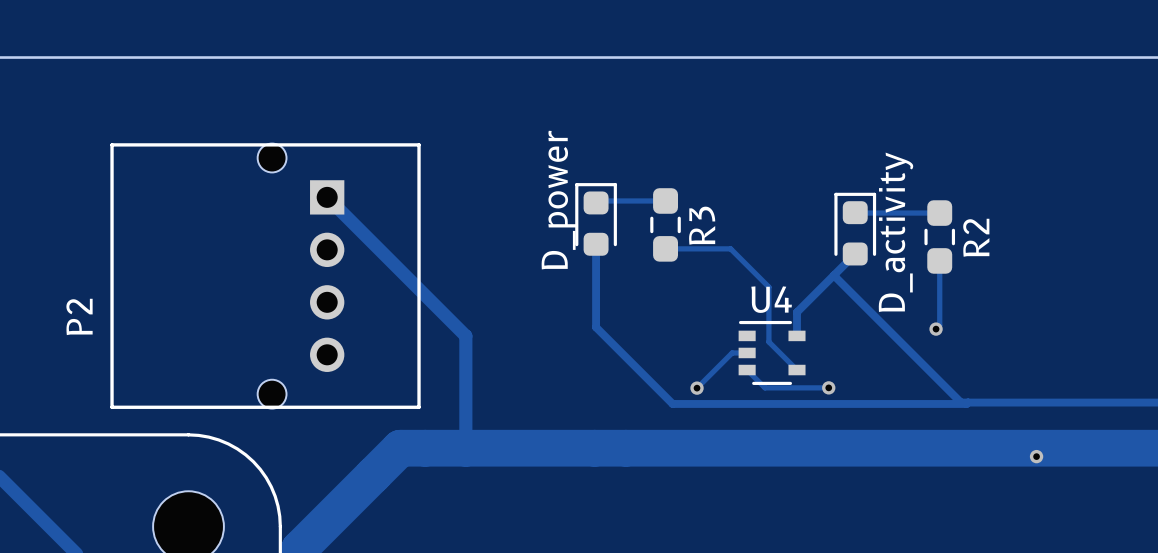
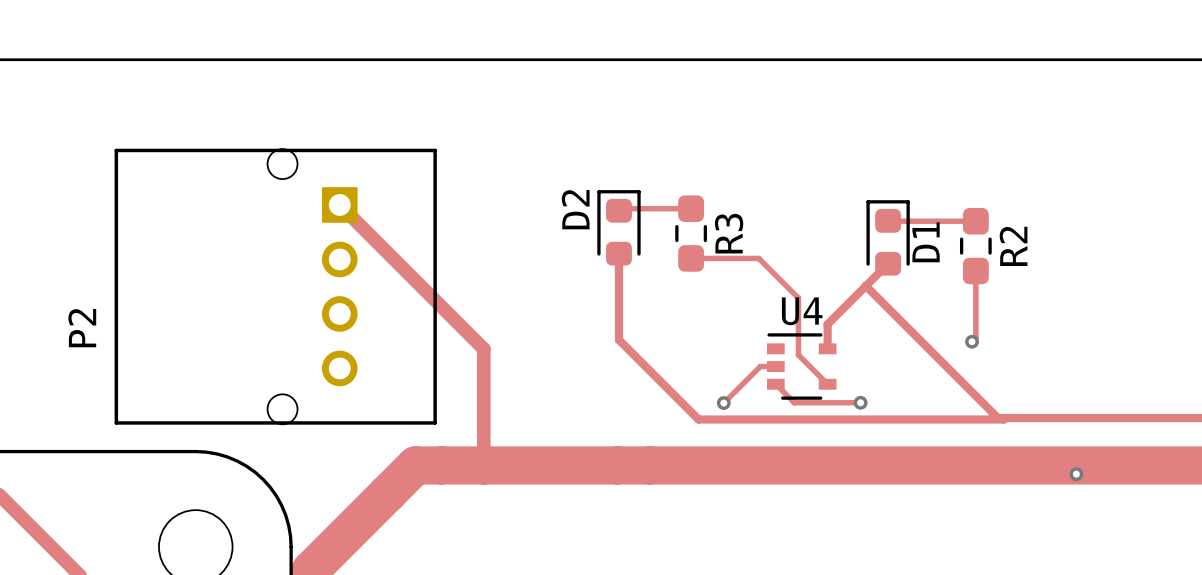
D_power name: D_power (559, 200) -> D2 (575, 209)
D_activity name: D_activity (896, 232) -> D1 (926, 242)

